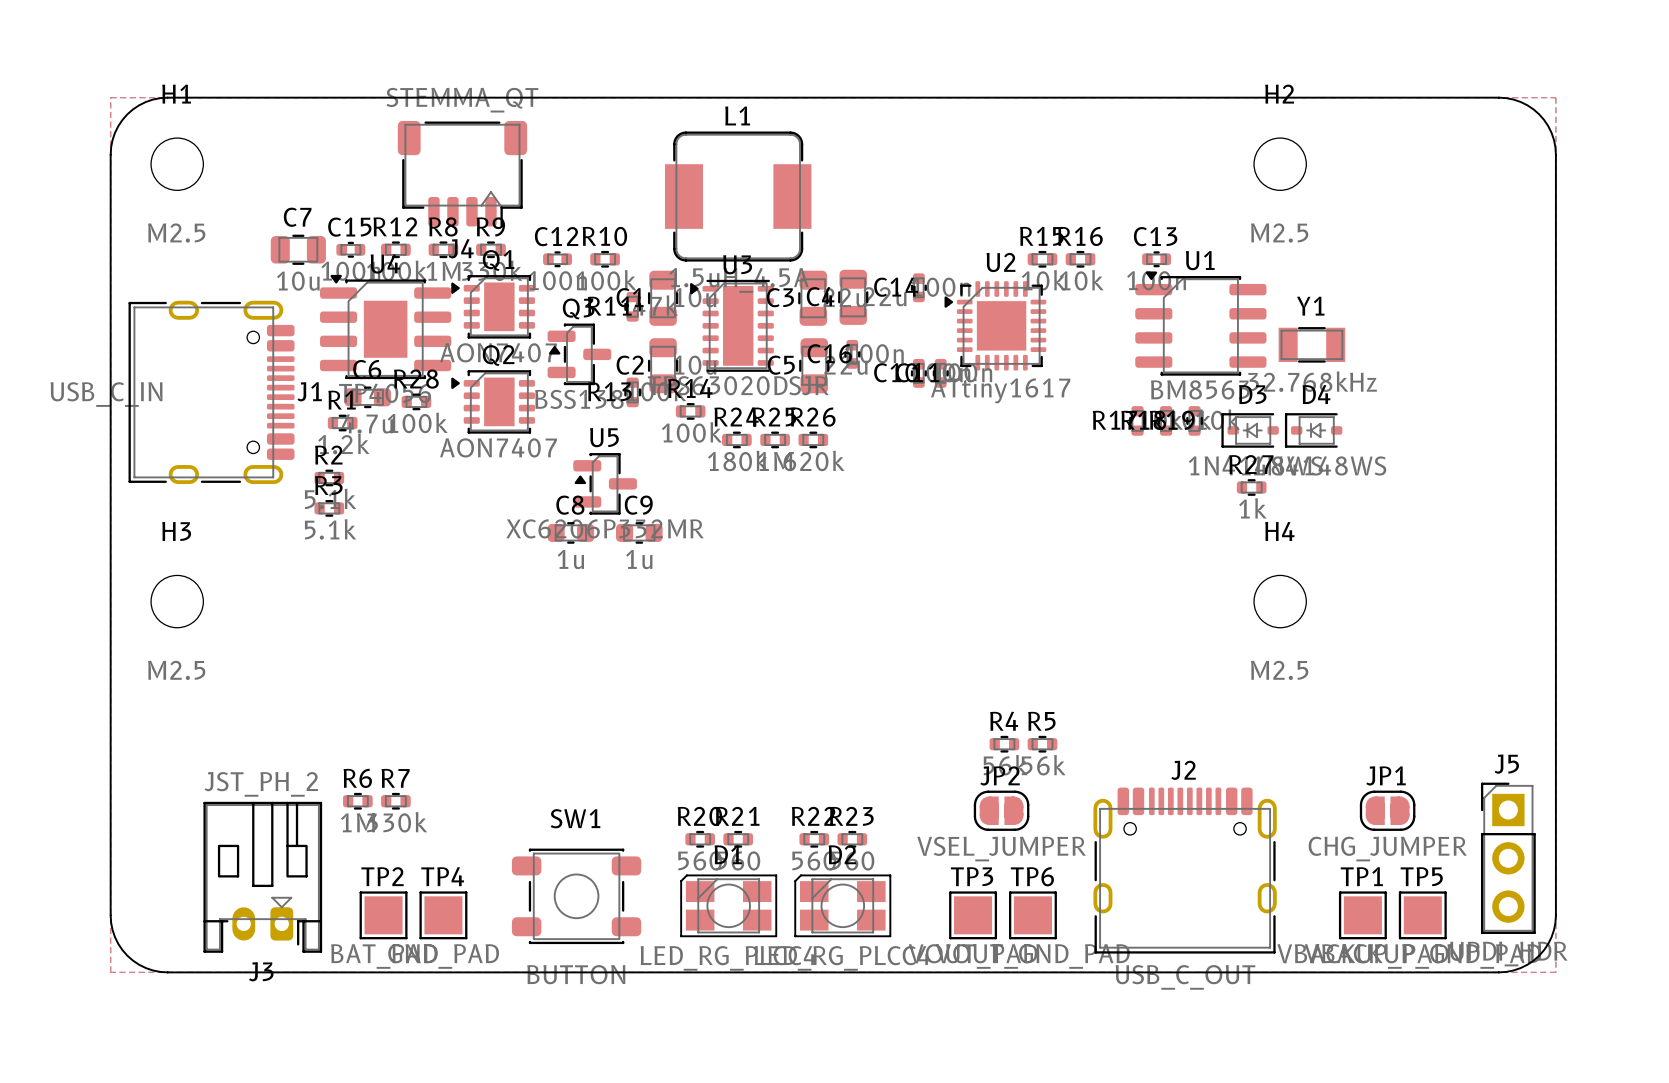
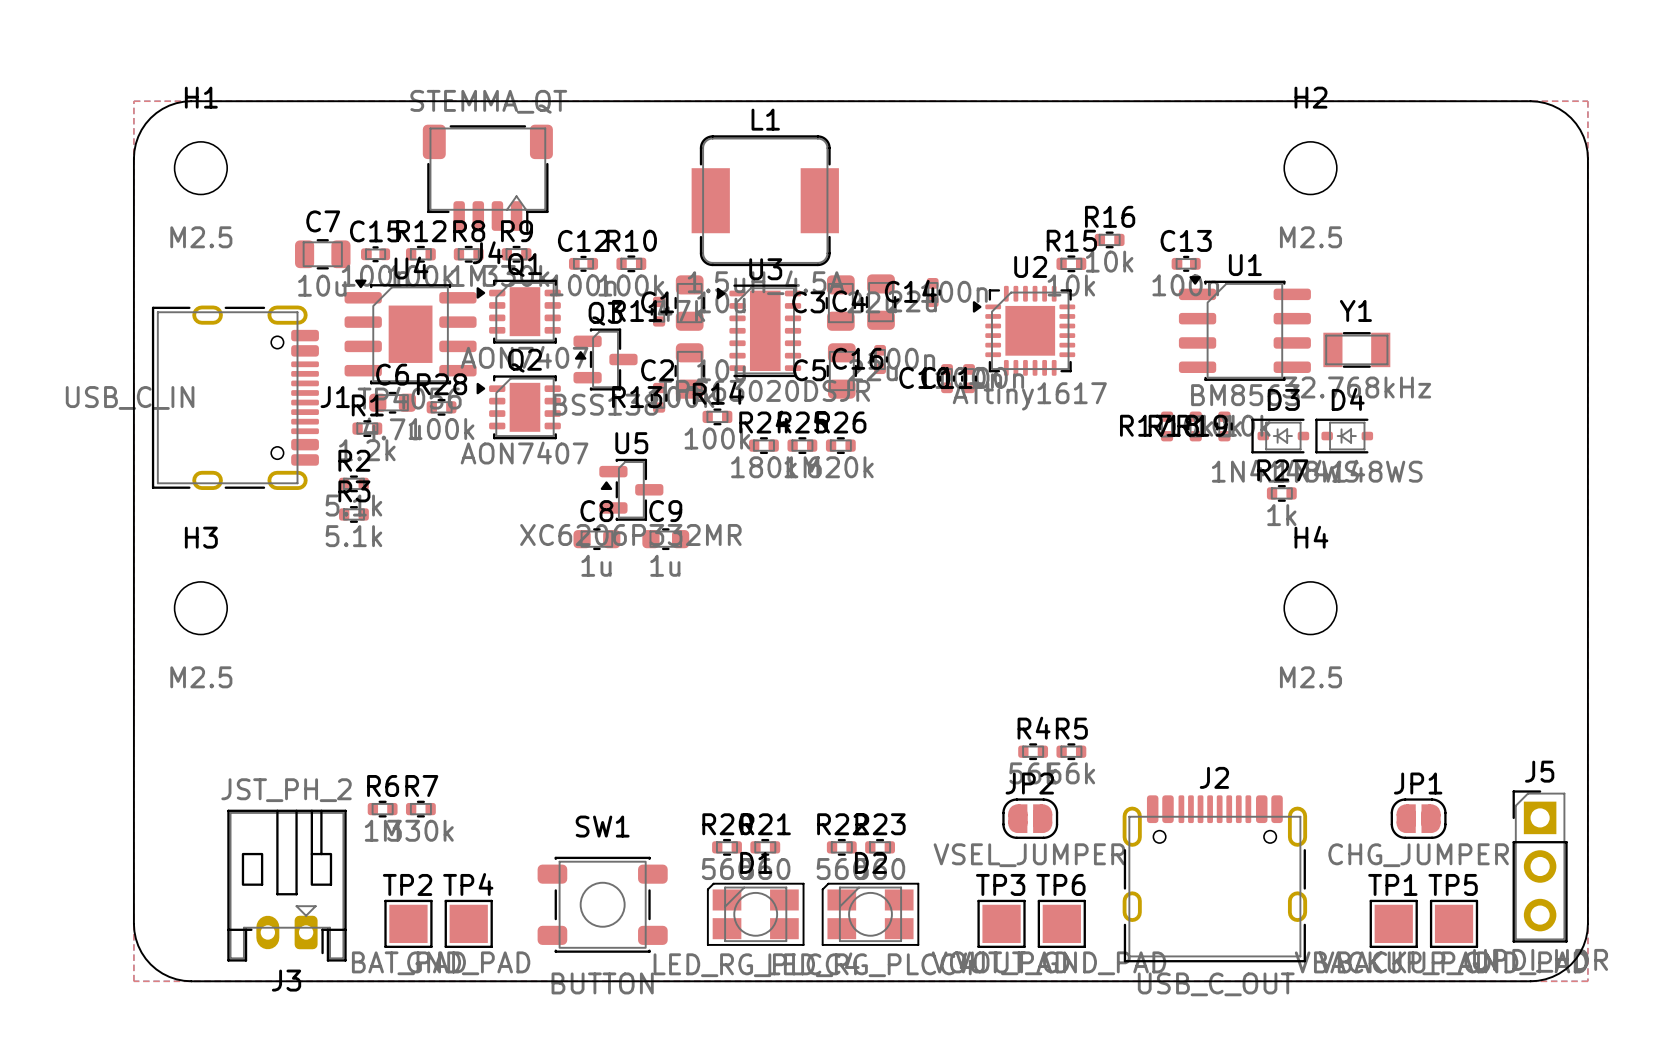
R16 position: (1080, 259) -> (1109, 239)
C14 position: (918, 287) -> (932, 292)
U1 position: (1200, 323) -> (1244, 328)
Y1 position: (1311, 344) -> (1356, 349)

